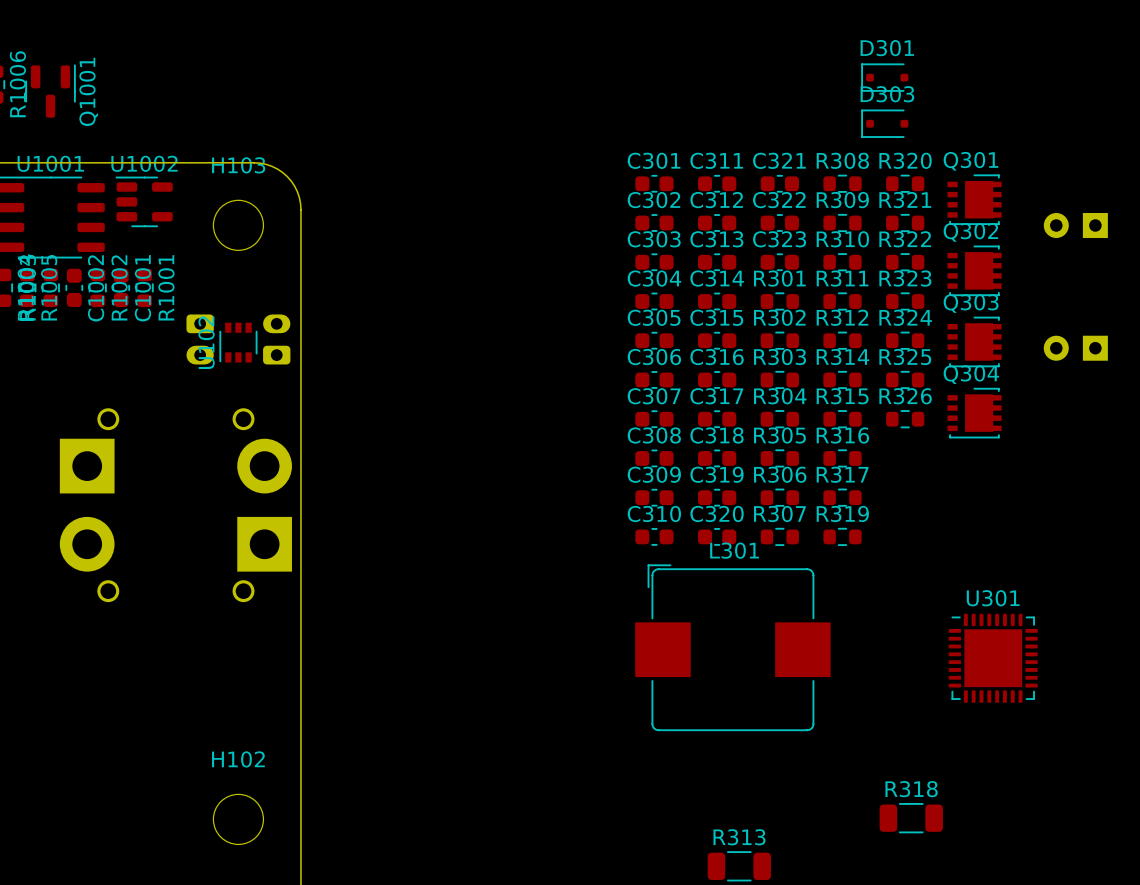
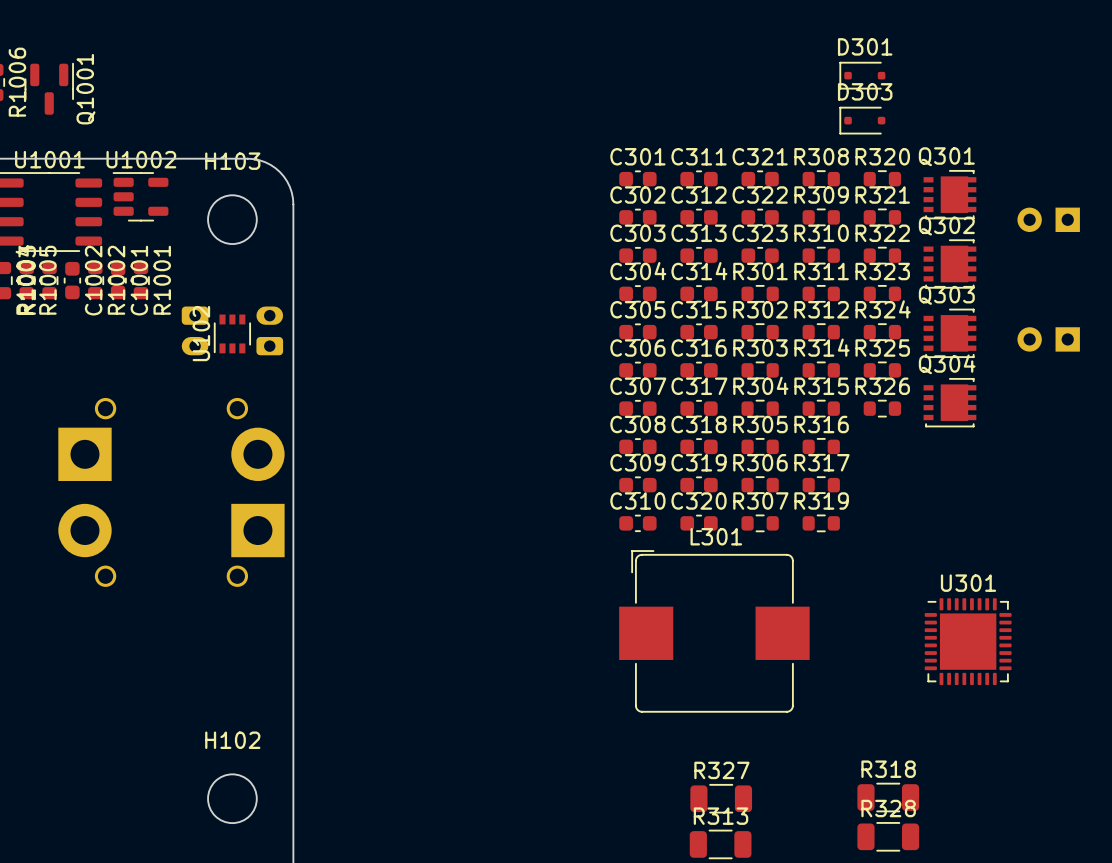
R327: none -> (721, 798)
R328: none -> (888, 836)

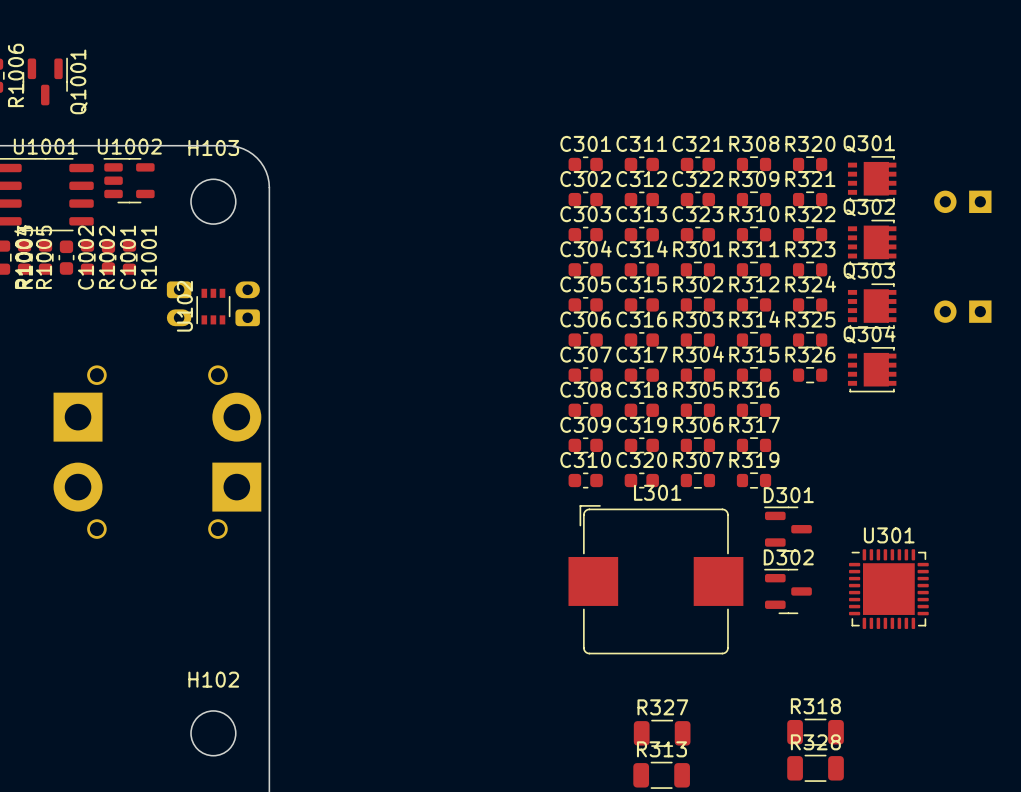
D301 footprint: [839, 61, 886, 90] -> [764, 506, 812, 552]
D303: (862, 120) -> none
D302: none -> (788, 591)

